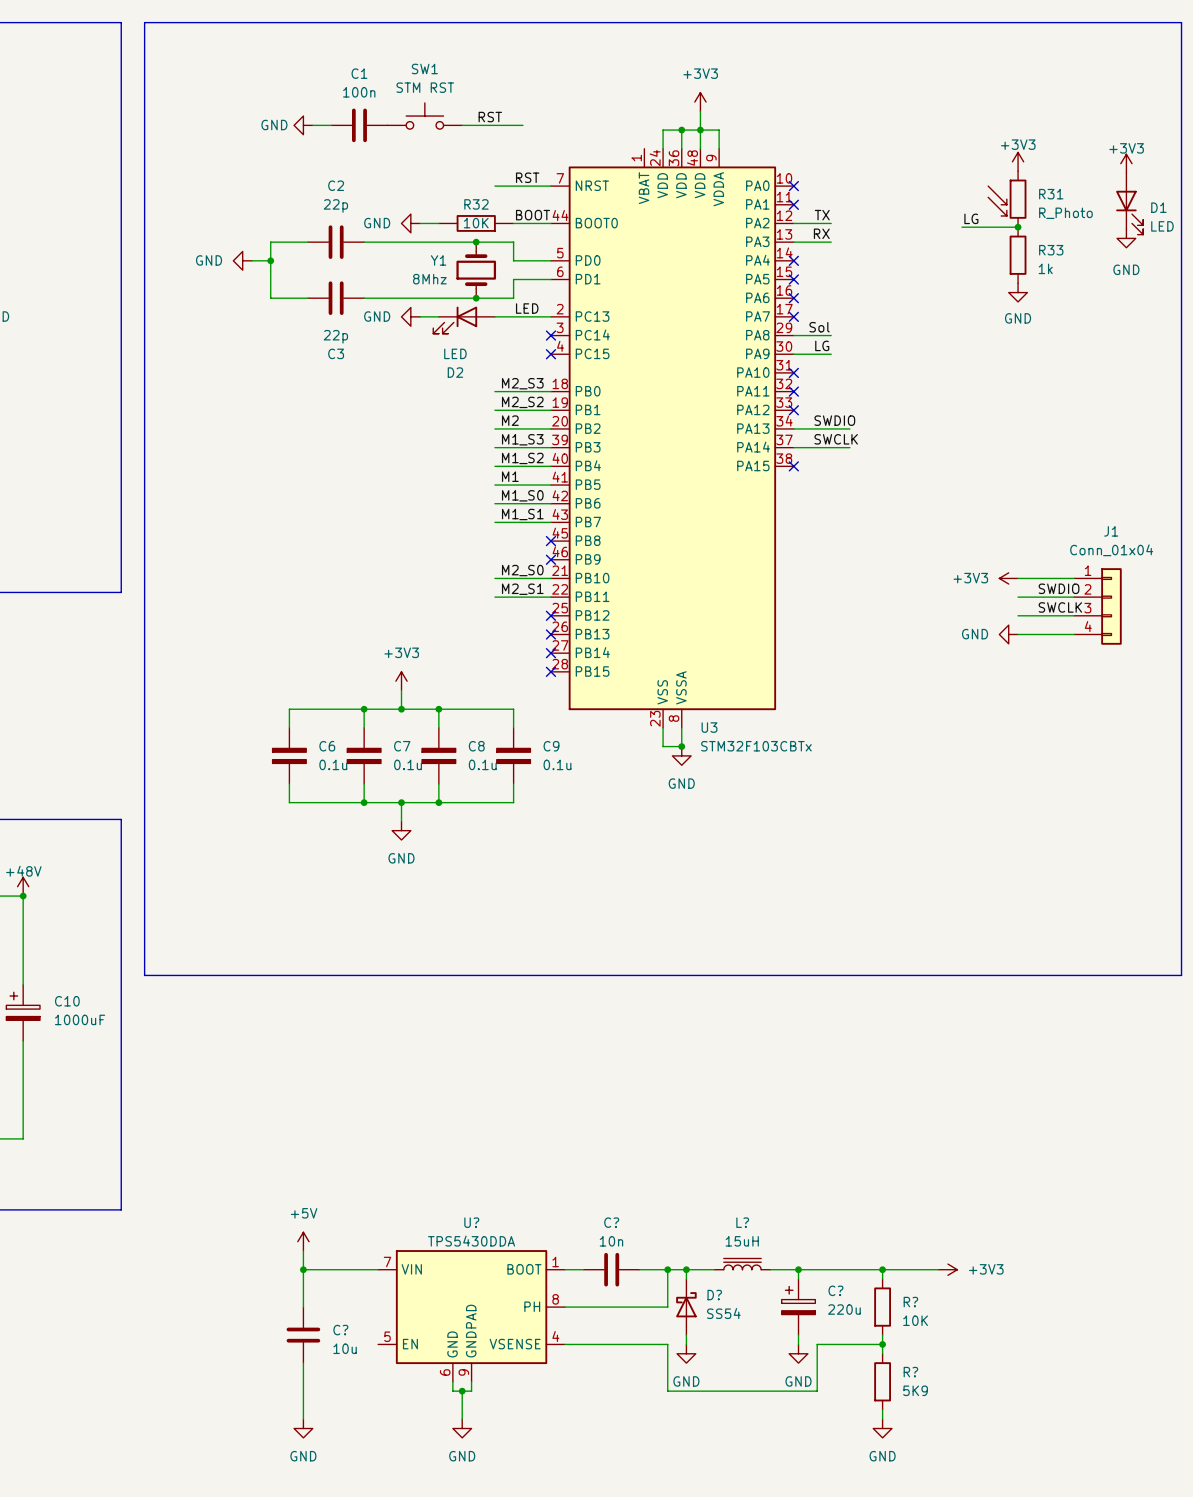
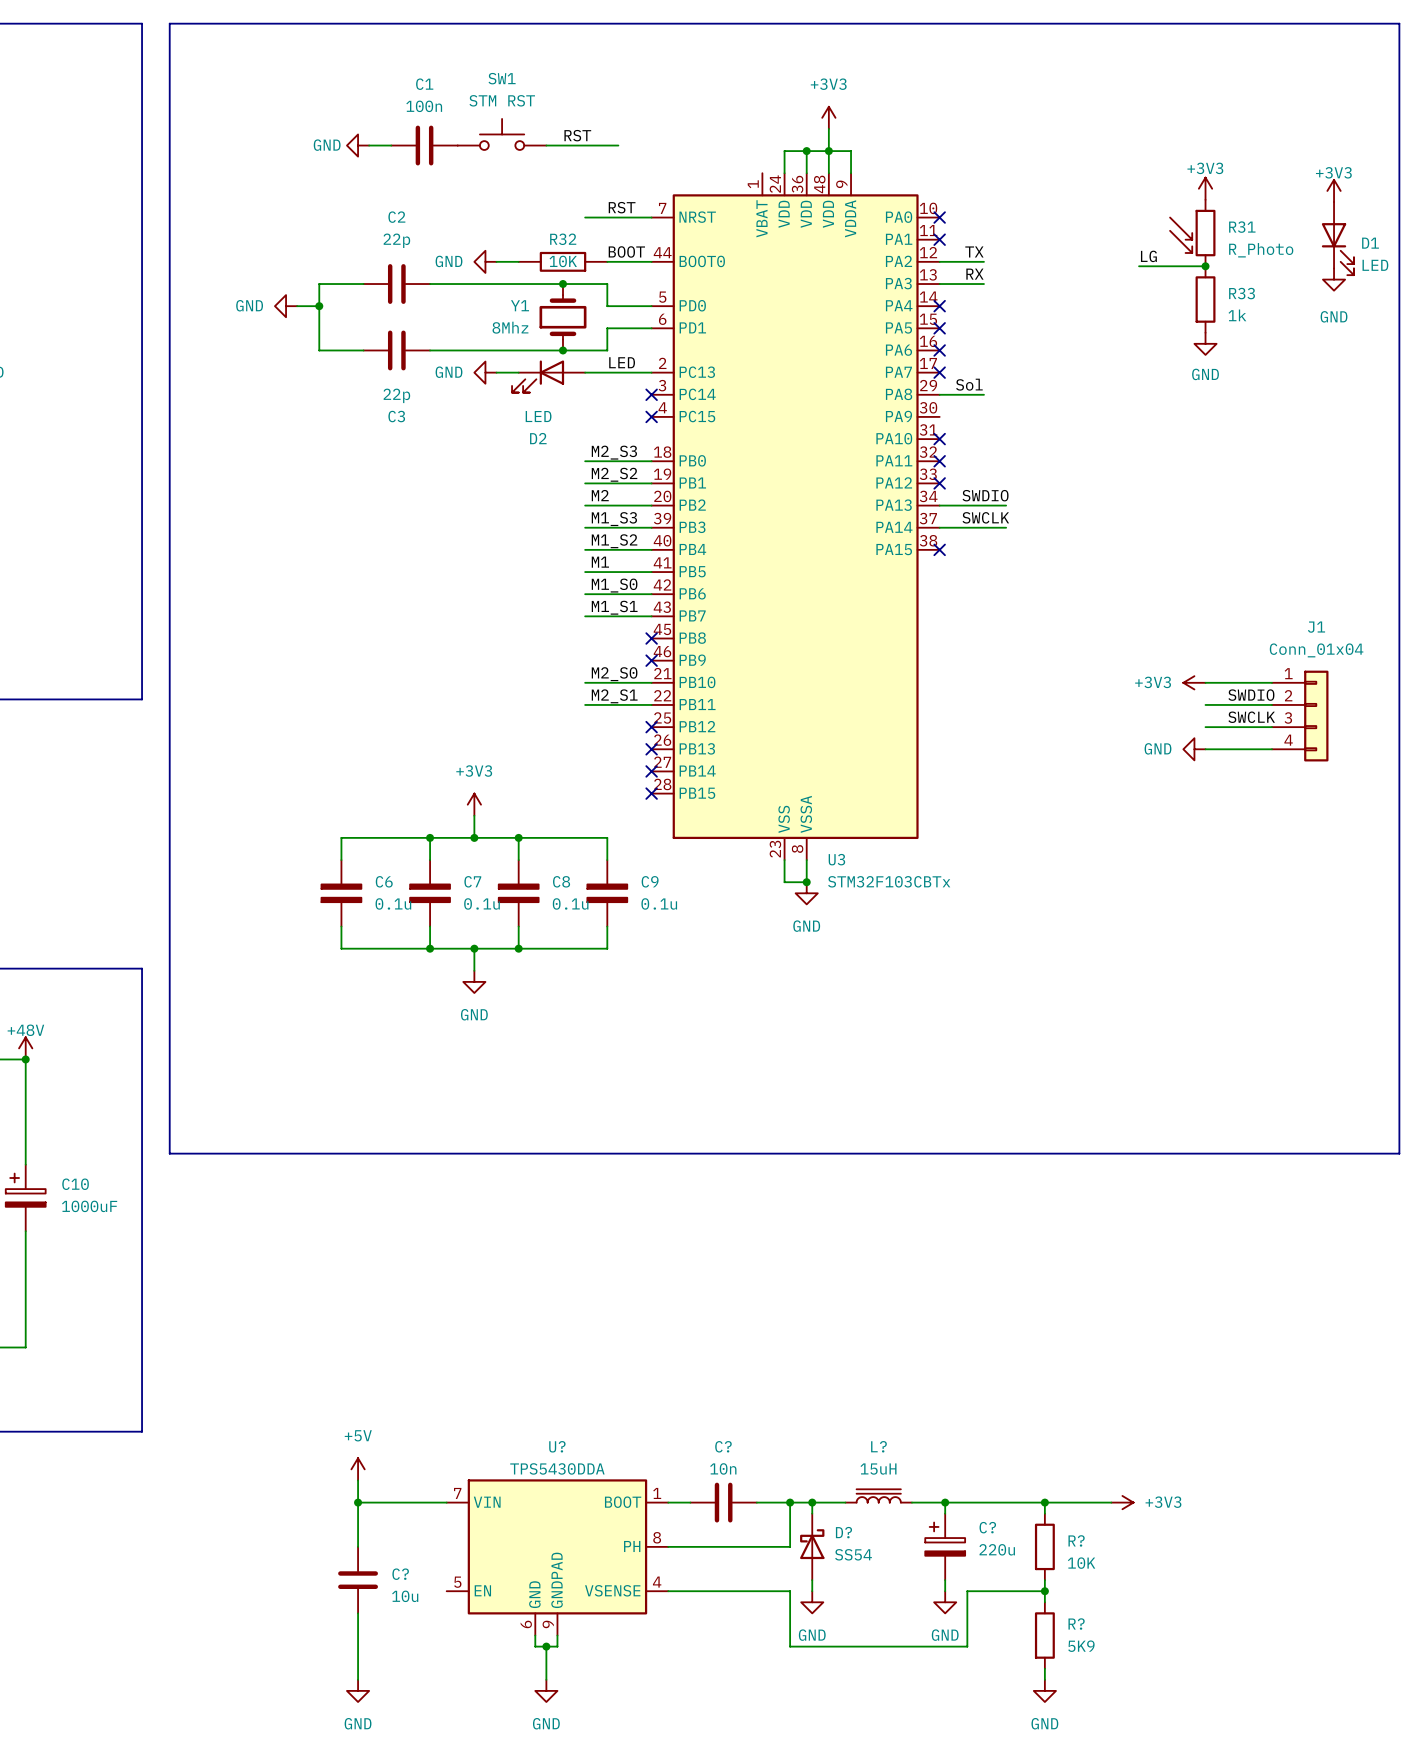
label: LG (822, 345) -> none
wire: (793, 354) (831, 354) -> none

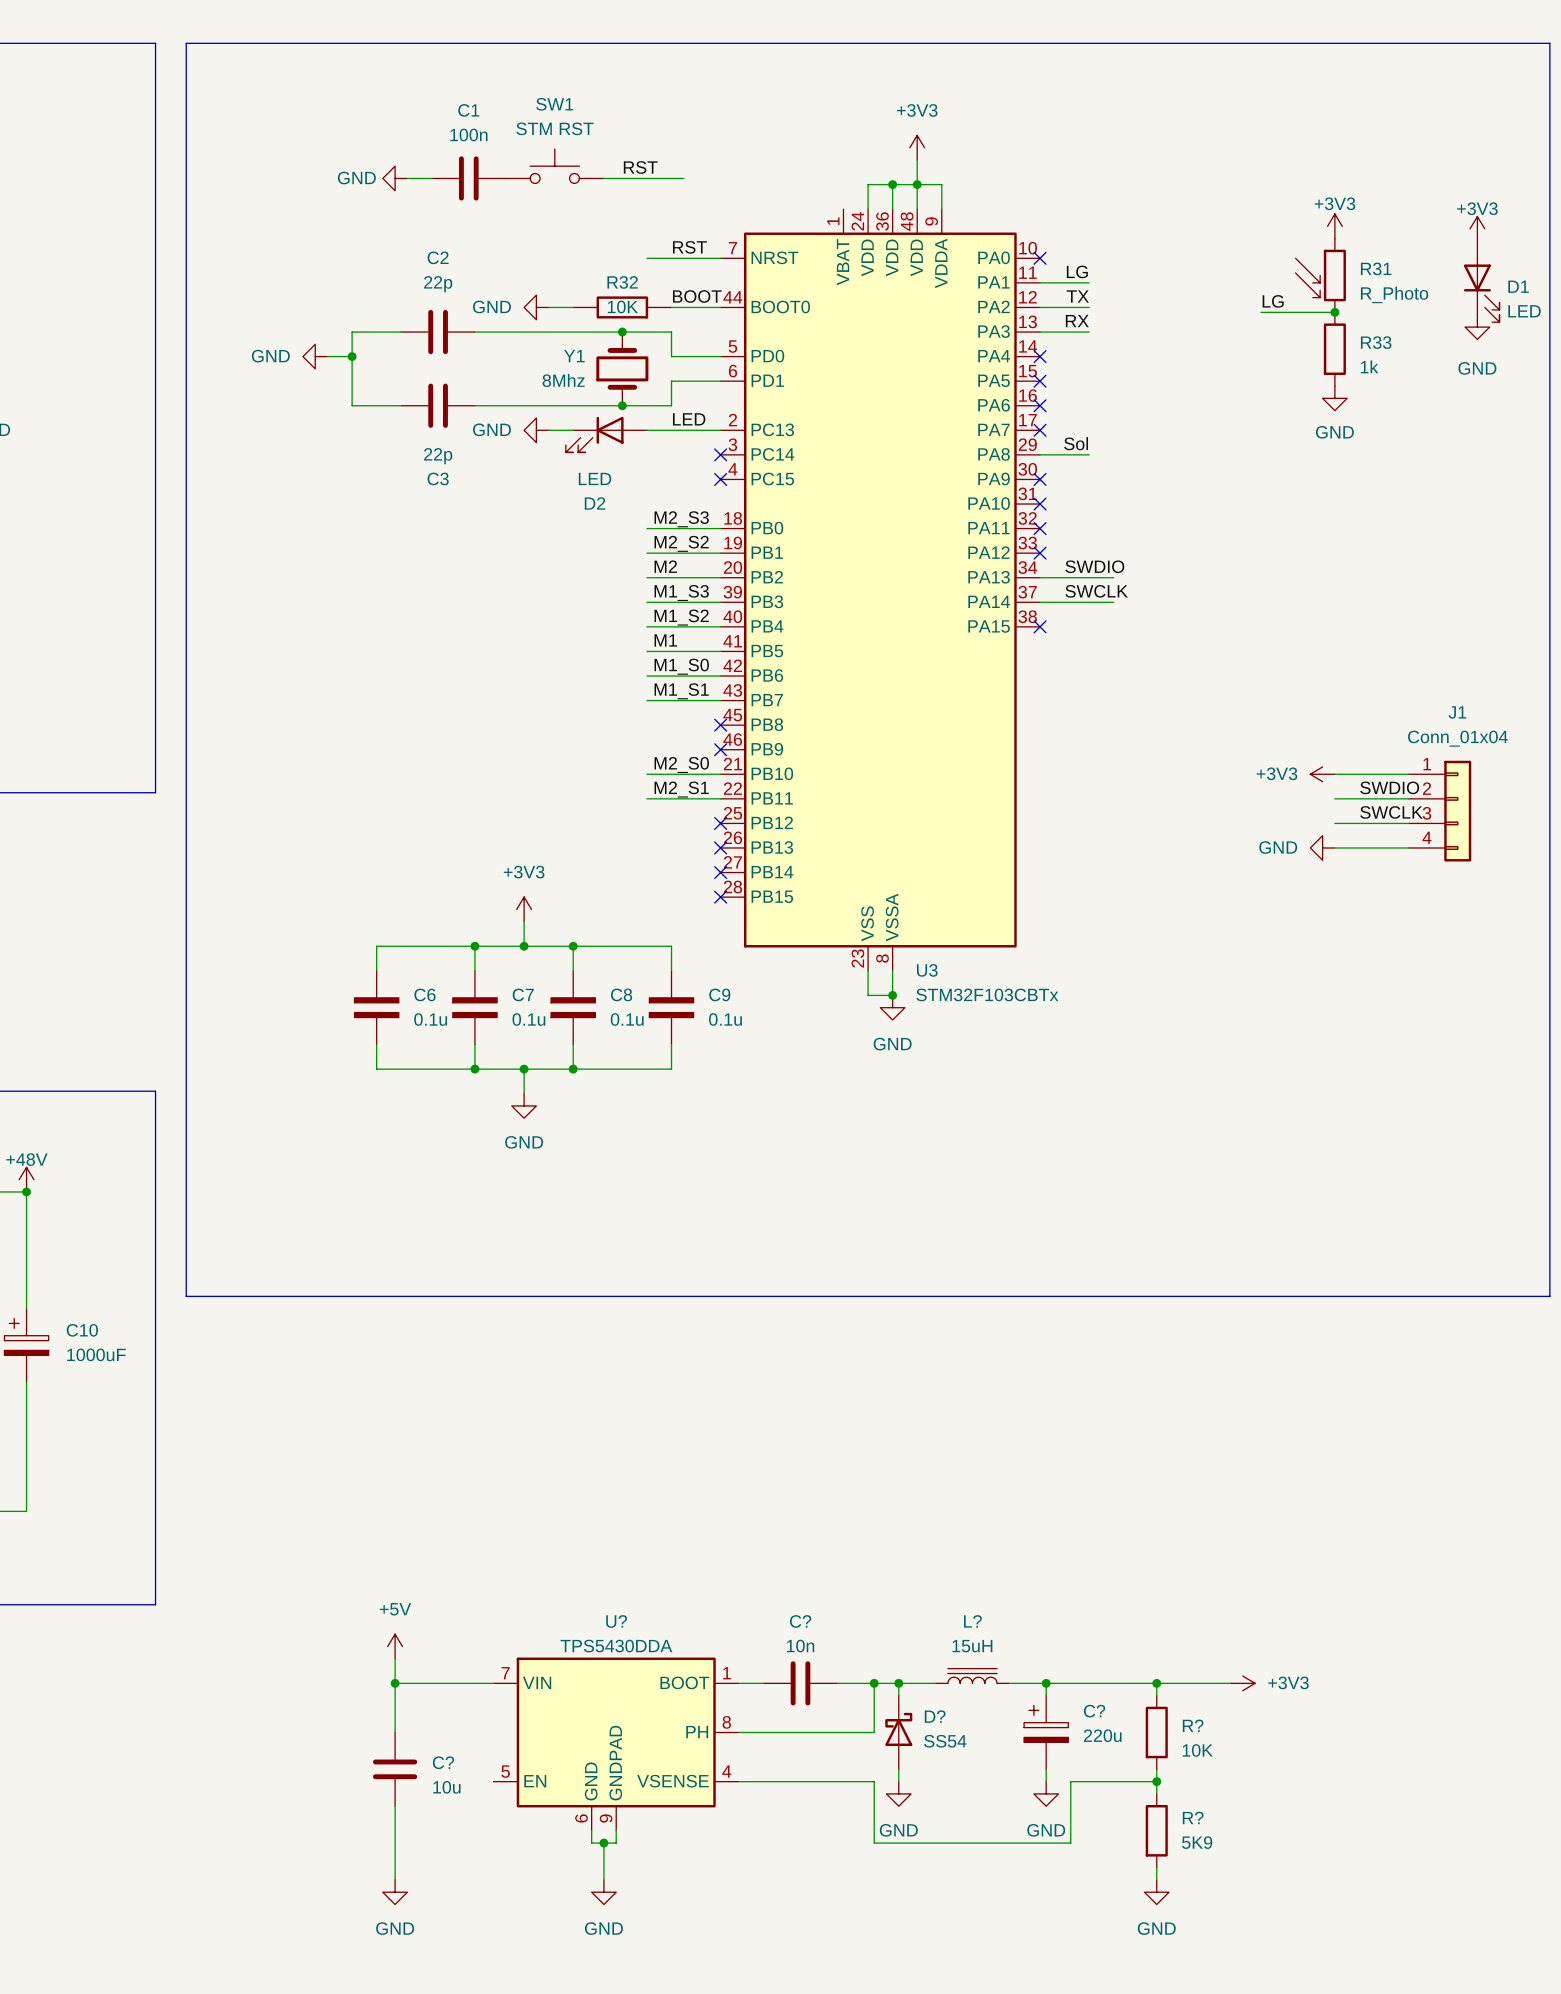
label: none -> LG (1077, 271)
wire: none -> (1040, 282) (1089, 282)
no-connect mark: (939, 239) -> none
no-connect mark: none -> (1040, 479)

